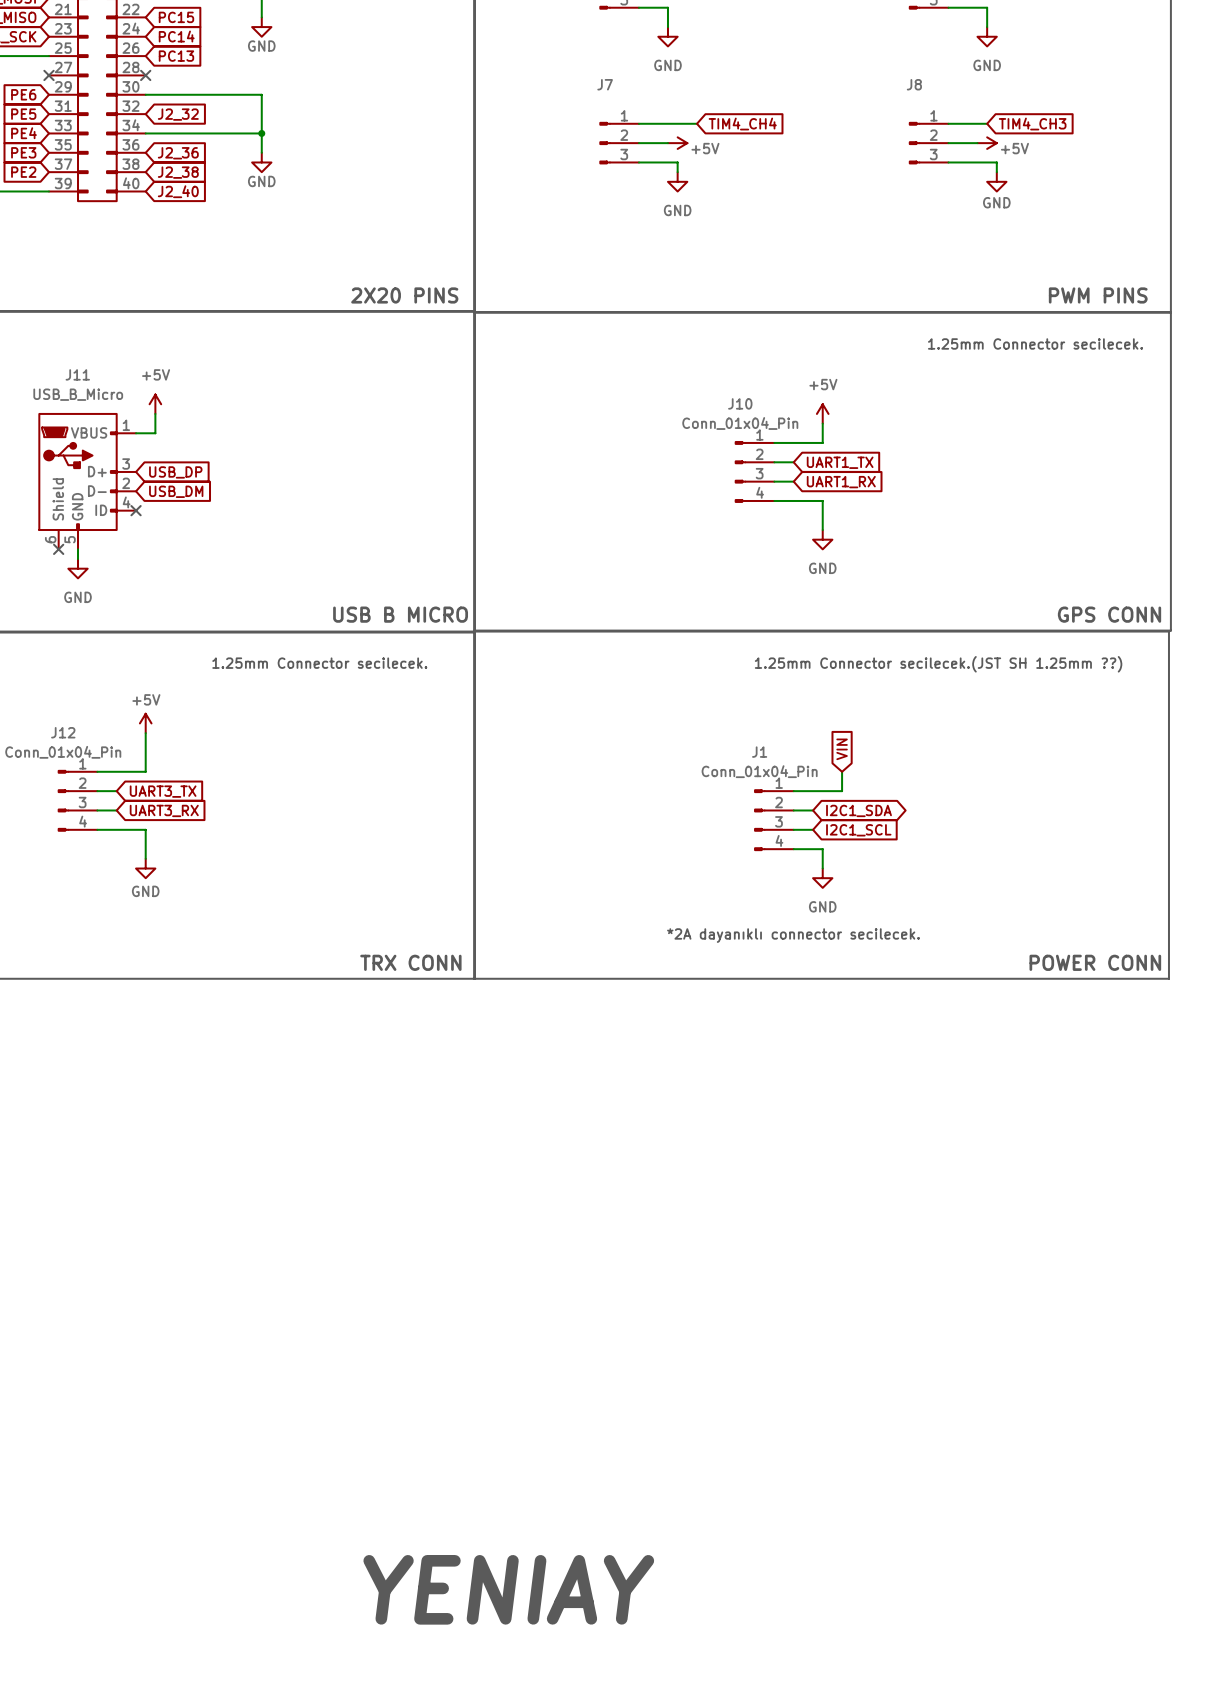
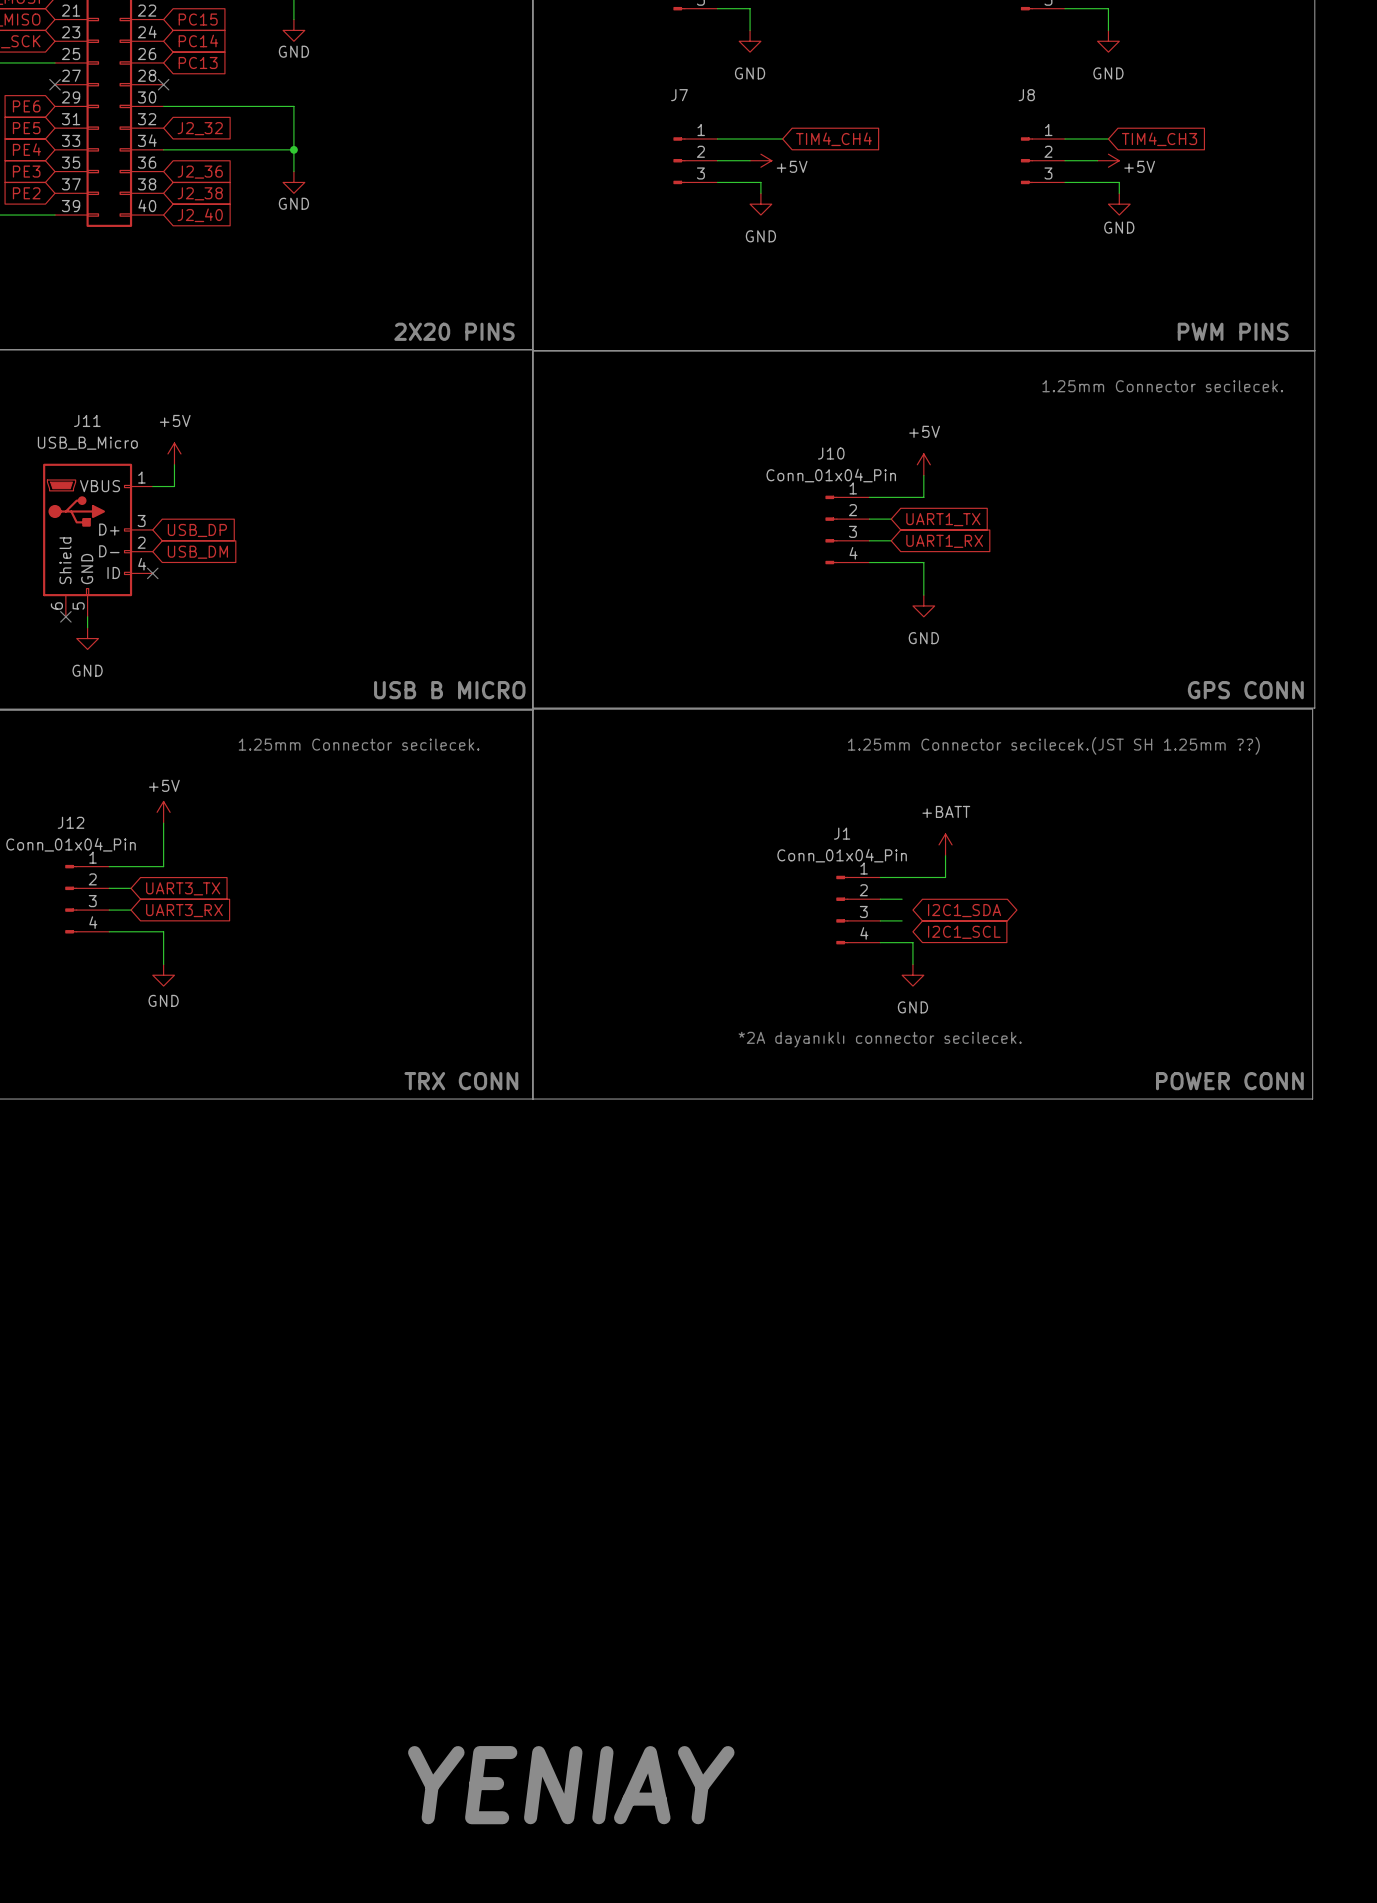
global label: VIN (842, 749) -> none
power symbol: none -> +BATT (945, 844)
wire: none -> (945, 855) (945, 866)
wire: (842, 781) (842, 791) (793, 791) -> (945, 877) (880, 877)
wire: (793, 810) (813, 810) -> (880, 899) (902, 899)
J1 position: (774, 820) -> (858, 910)
wire: (793, 829) (813, 829) -> (880, 920) (902, 920)
wire: (793, 849) (822, 849) (822, 868) -> (880, 942) (912, 942) (912, 964)
power symbol position: GND (822, 878) -> GND (912, 975)
text position: *2A dayanıklı connector secilecek. (793, 935) -> *2A dayanıklı connector secilecek. (880, 1039)

